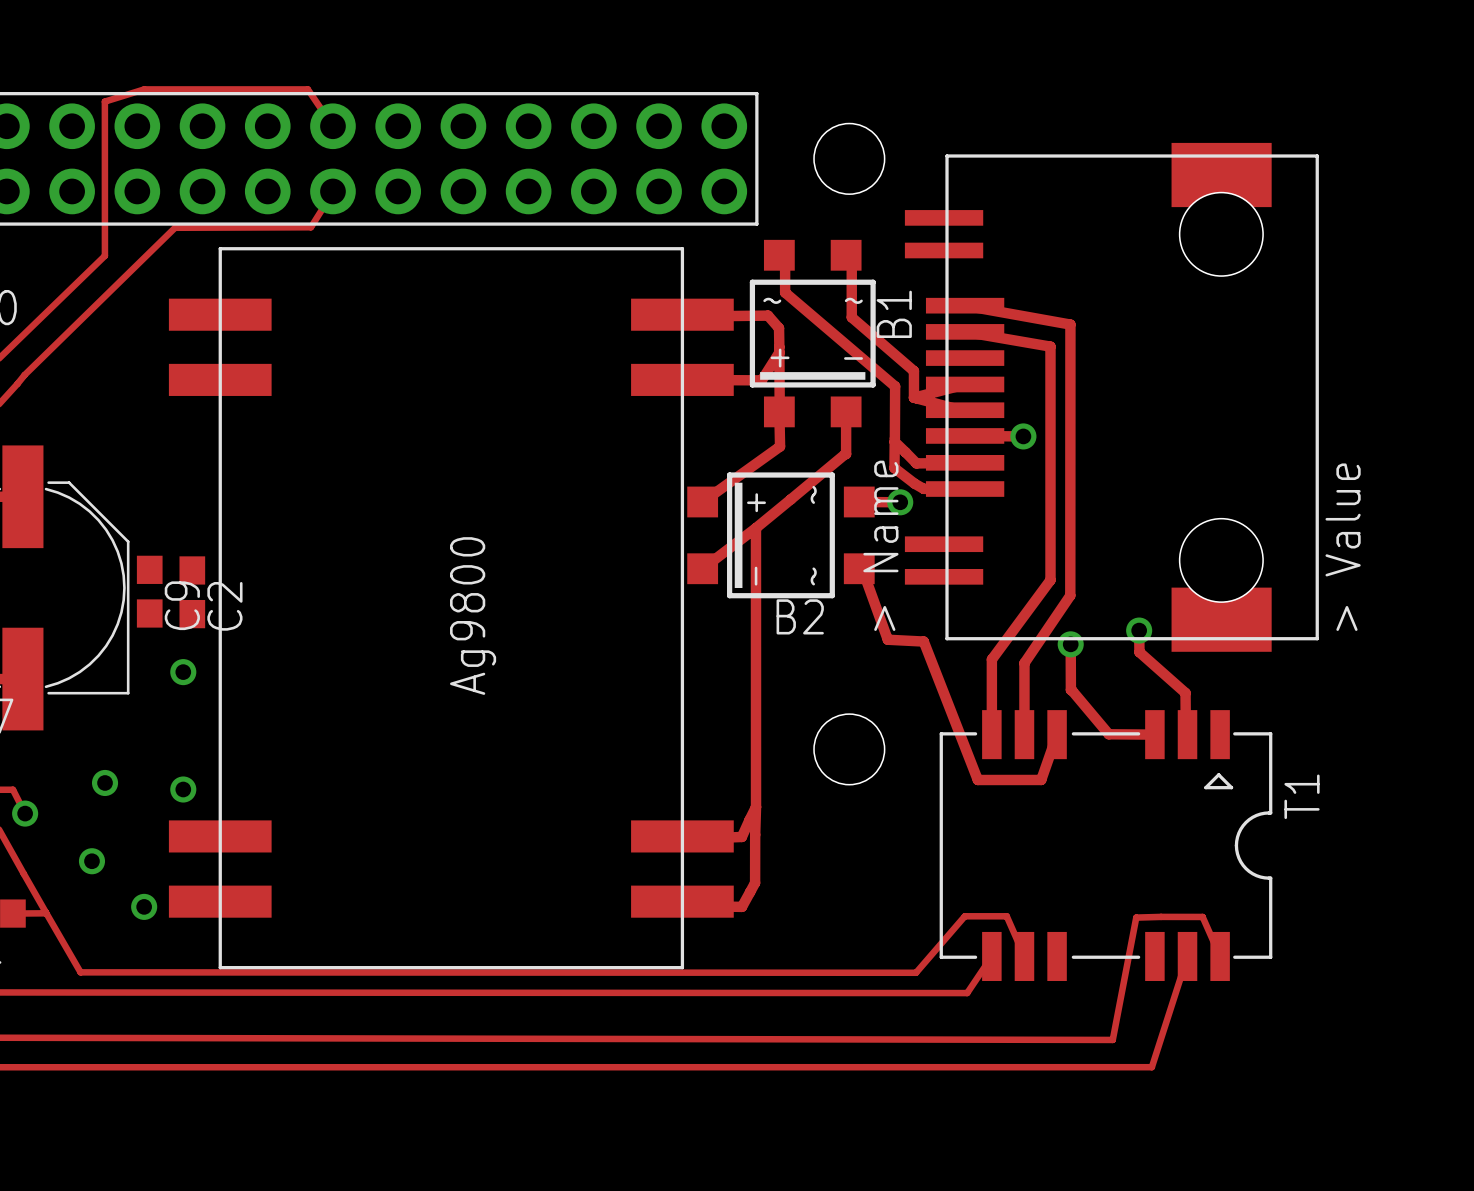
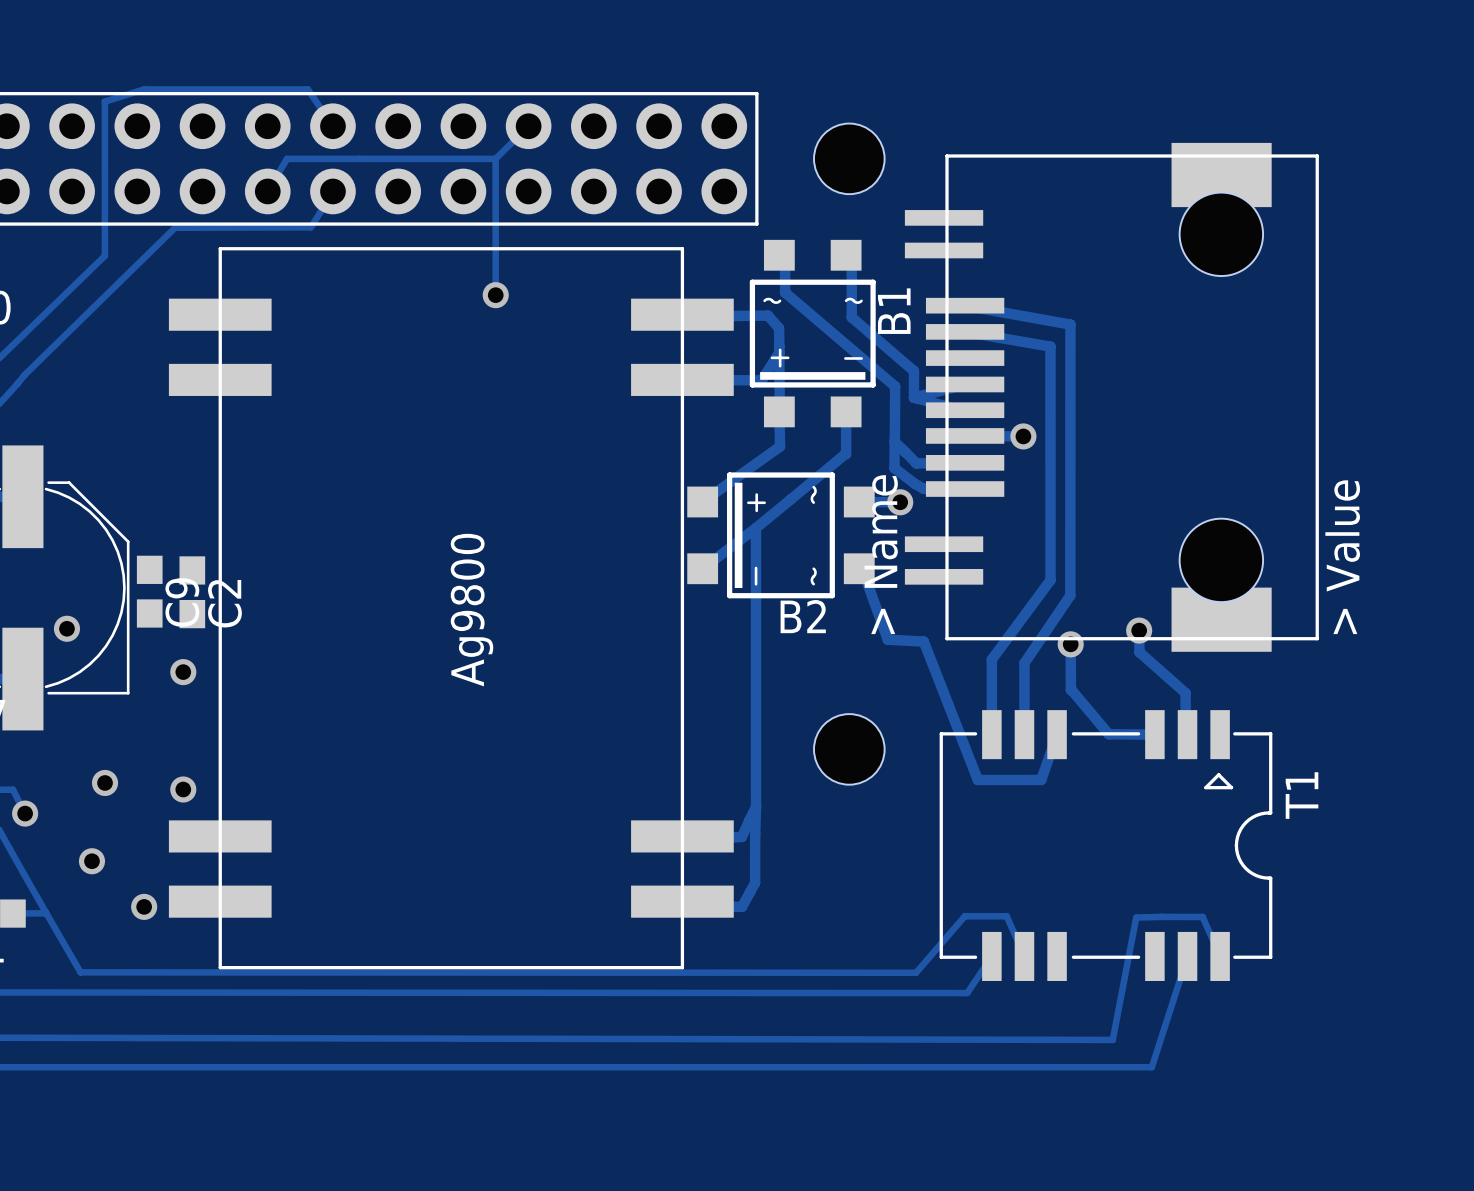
track: none -> (528, 126) (495, 158)
track: none -> (495, 158) (495, 295)
track: none -> (495, 158) (286, 158) (267, 191)
via: none -> (495, 295)
via: none -> (66, 628)

